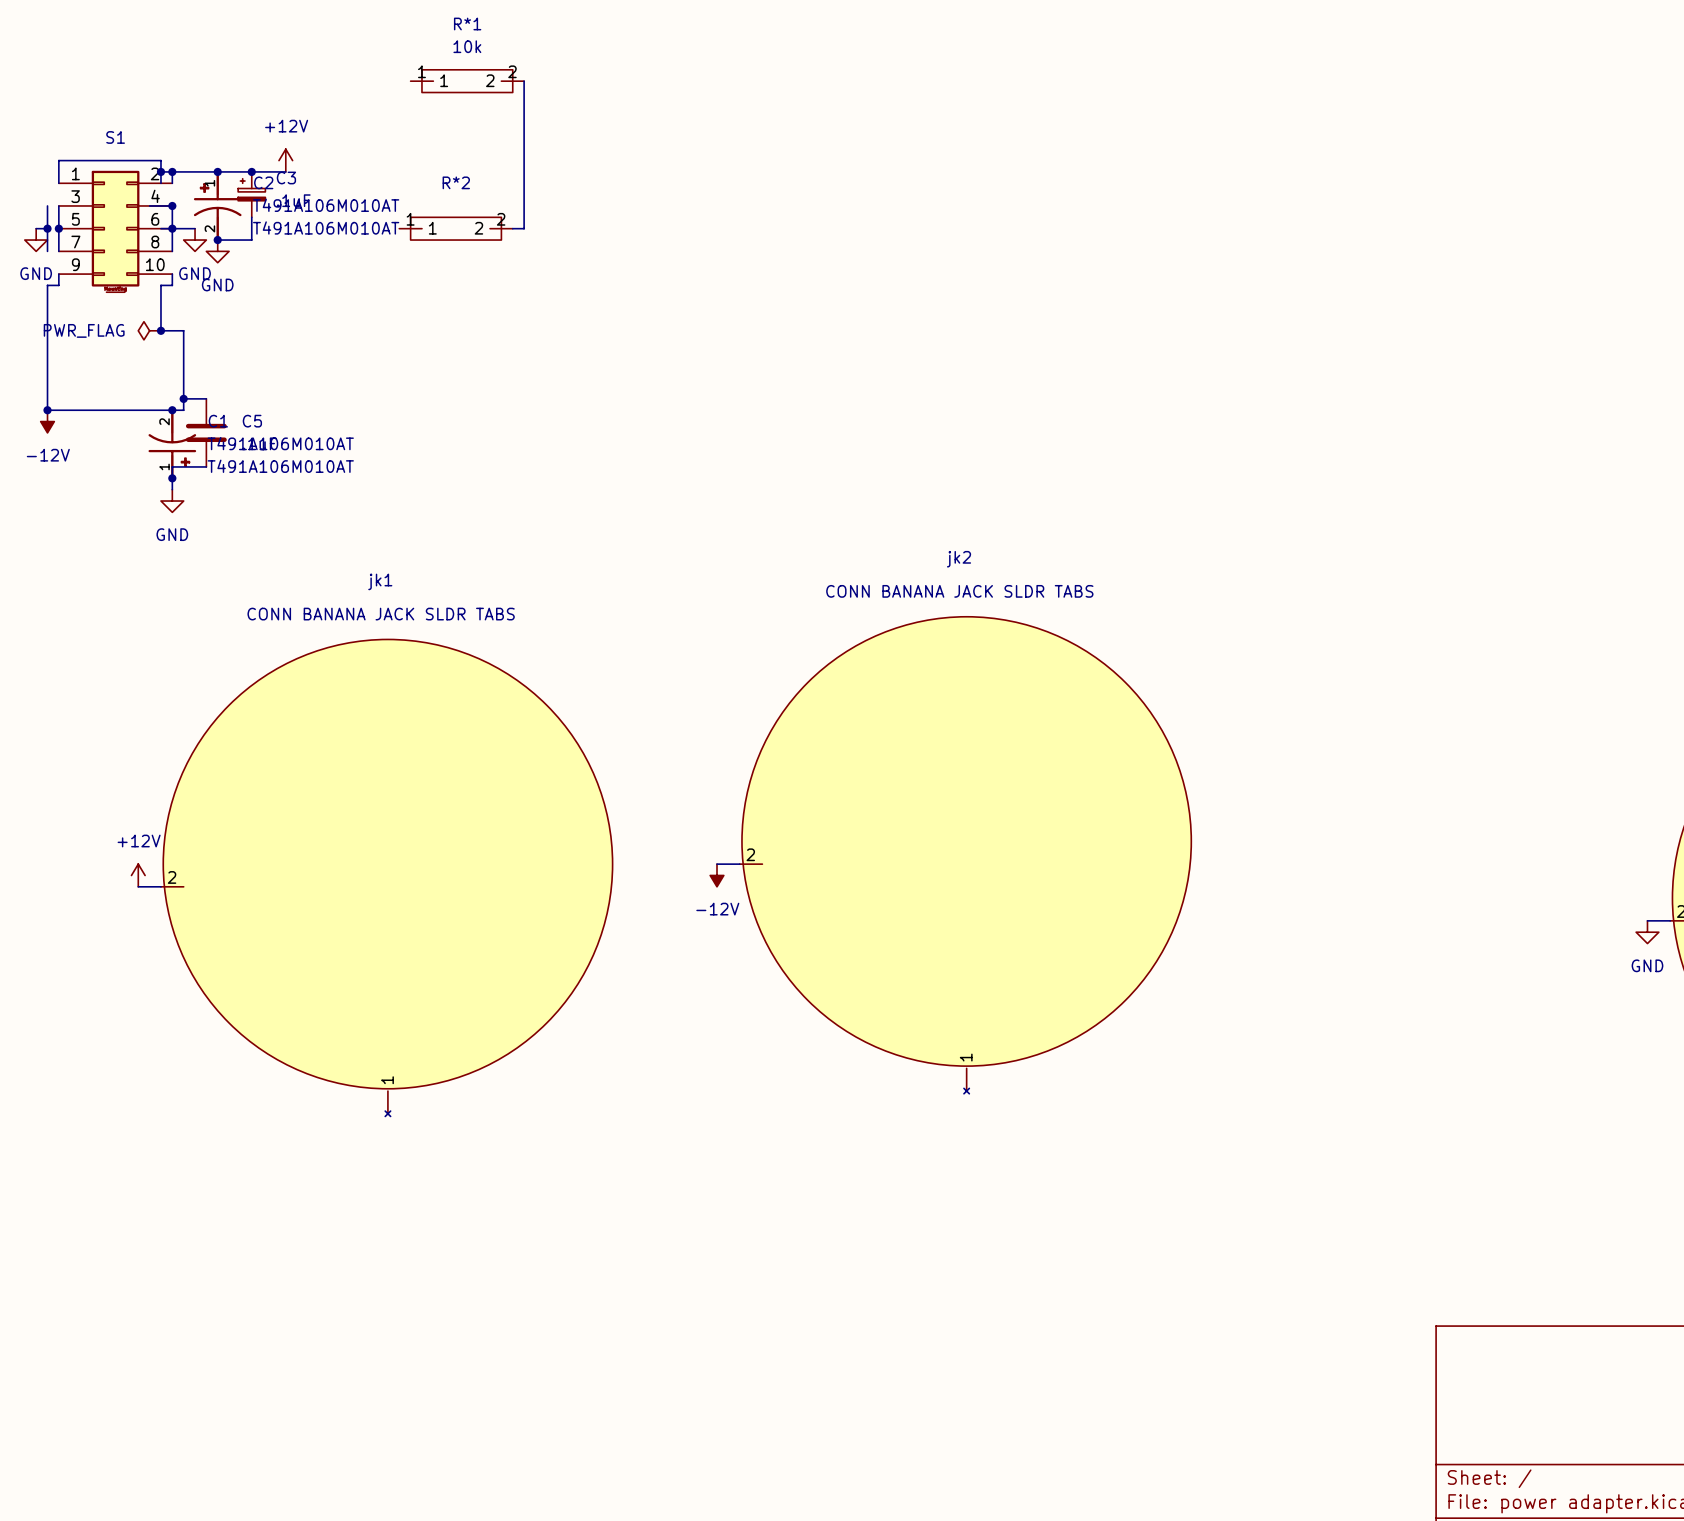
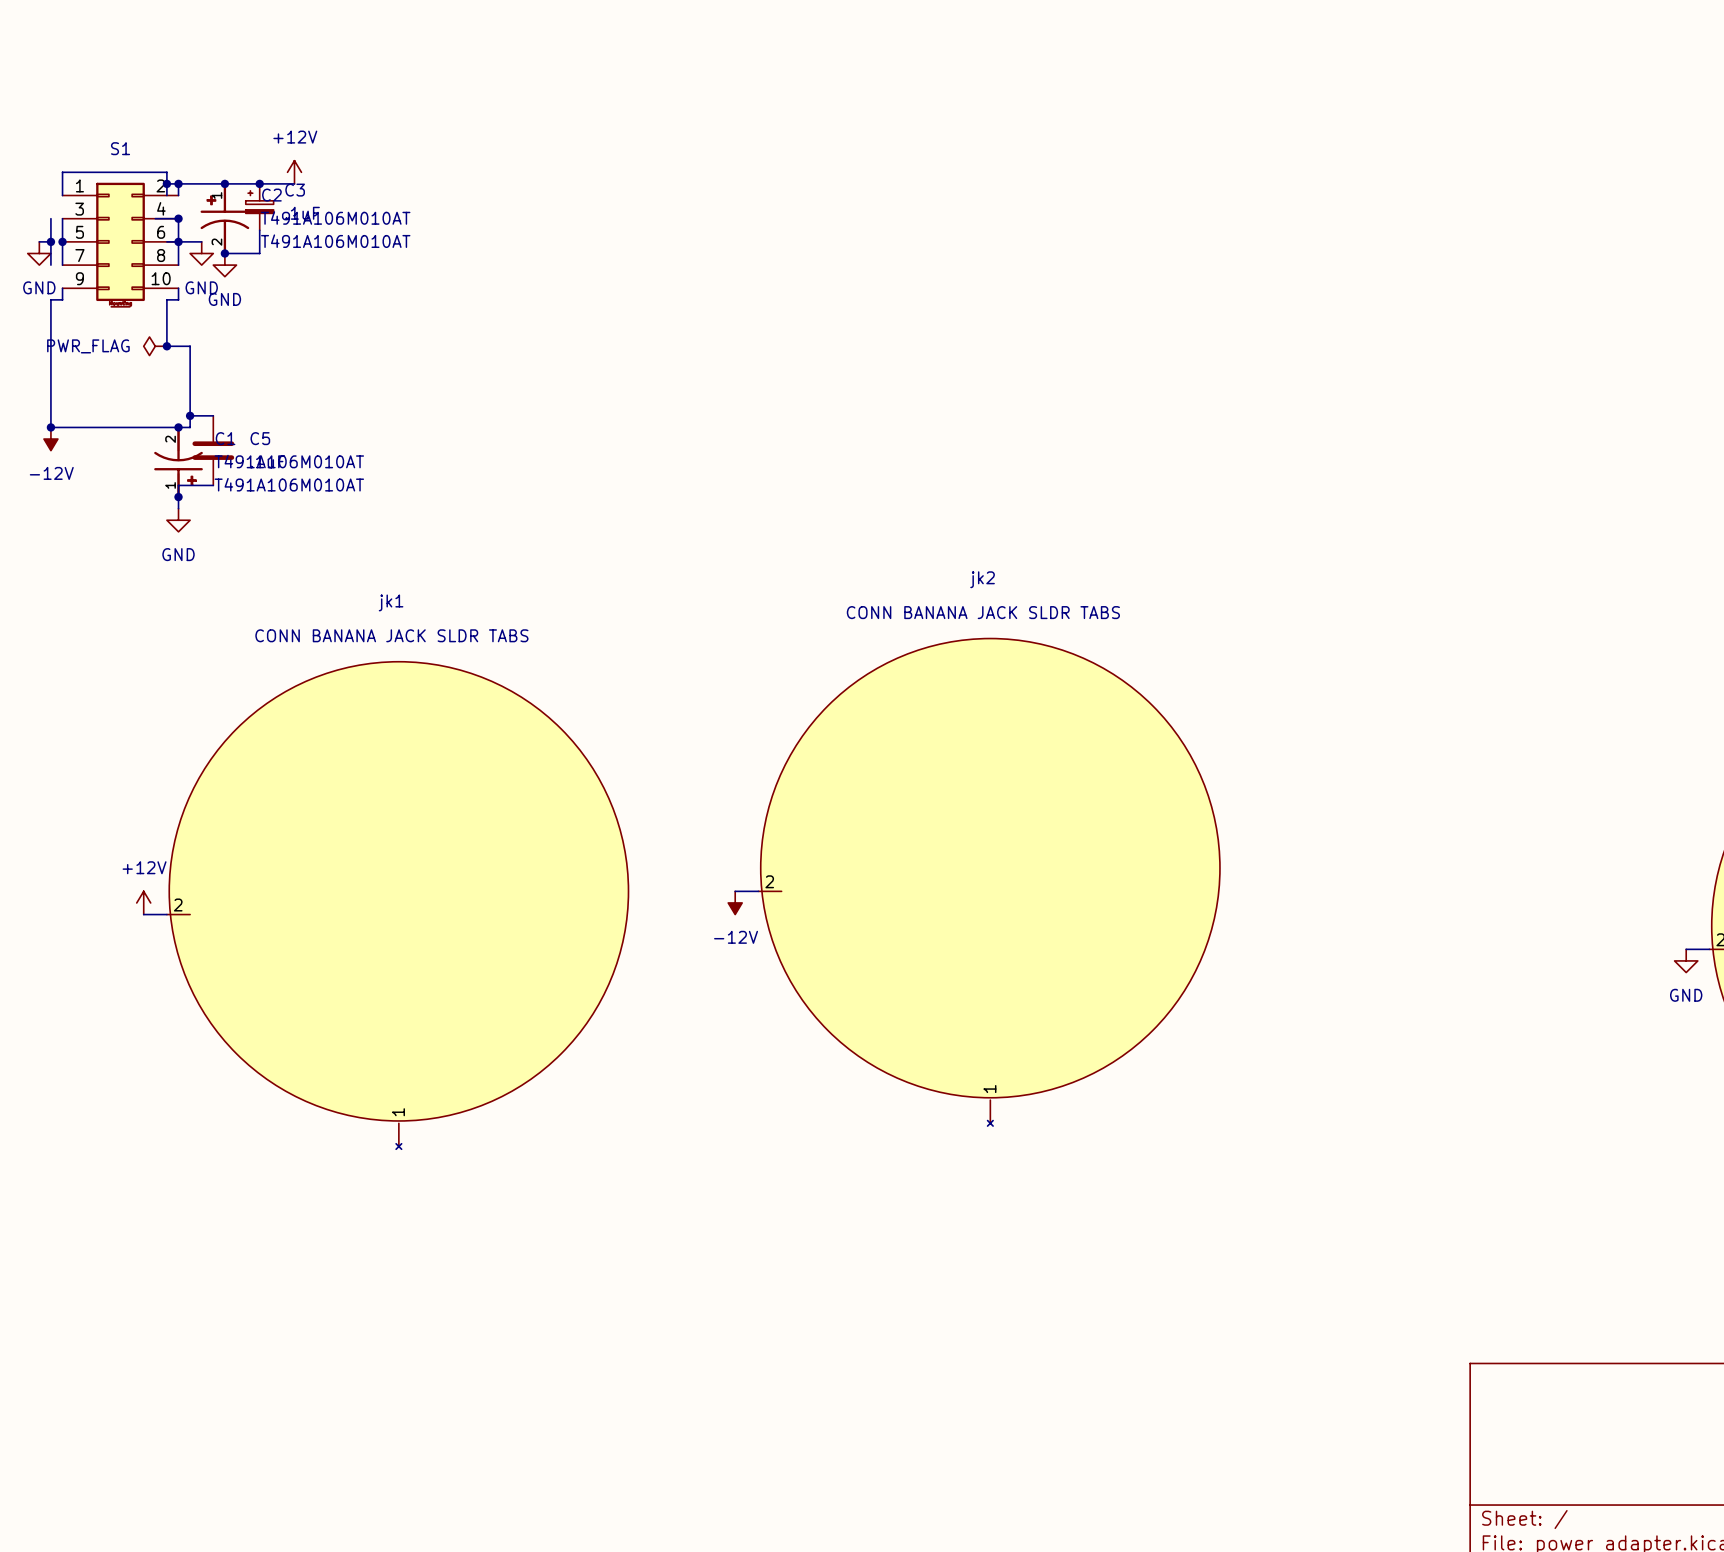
R*1: 10k (467, 81) -> none
wire: (524, 81) (524, 228) (512, 228) -> none
R*2: (456, 228) -> none

